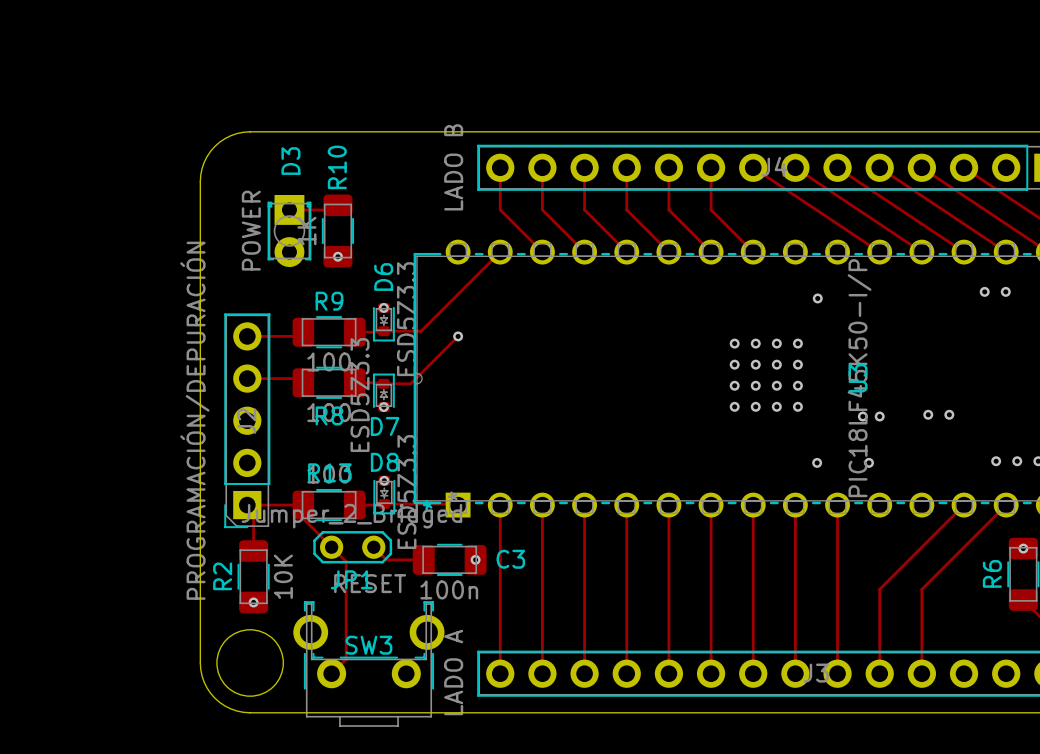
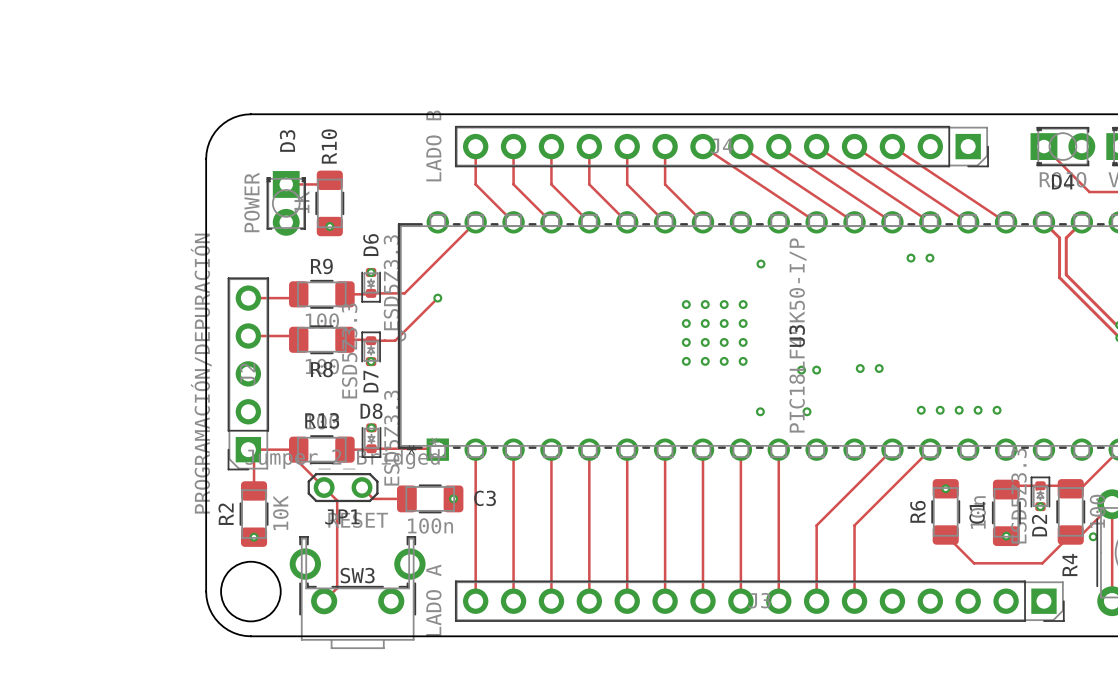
D7 name rotation: 0° (385, 426) -> 90° counterclockwise (370, 381)

